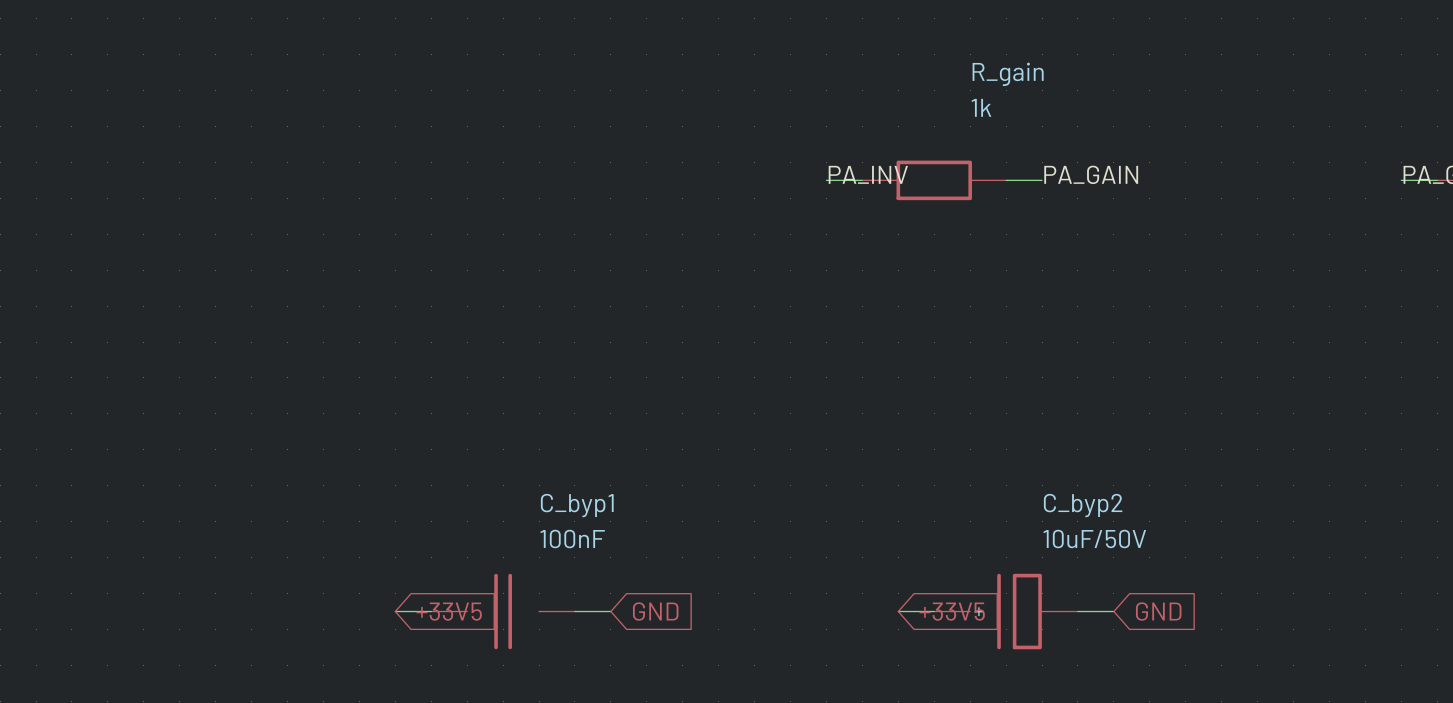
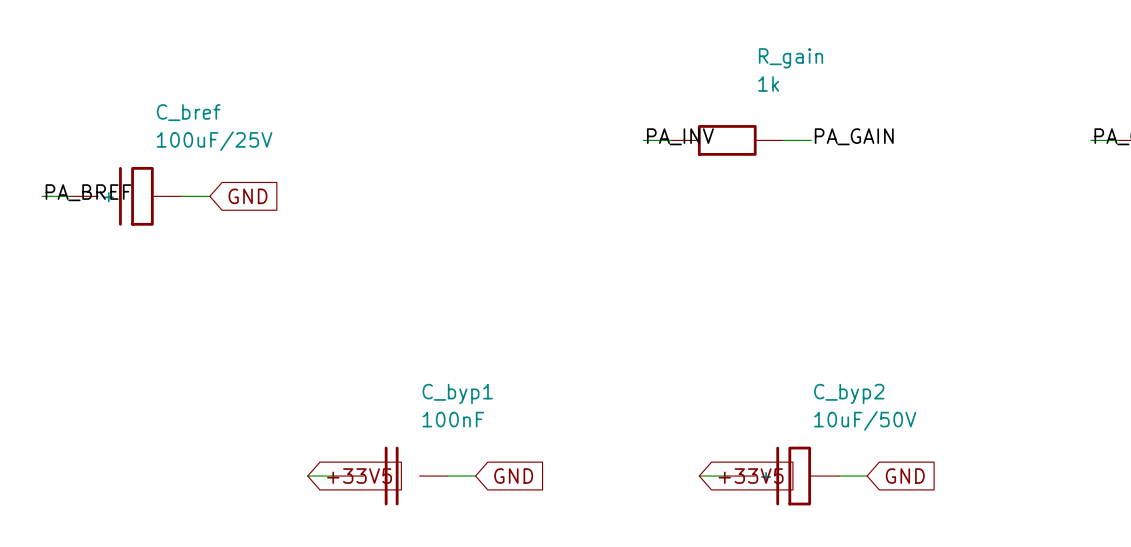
label: none -> PA_BREF (88, 192)
wire: none -> (42, 196) (70, 196)
C_bref: none -> 100uF/25V (125, 196)
wire: none -> (181, 196) (209, 196)
global label: none -> GND (247, 196)

